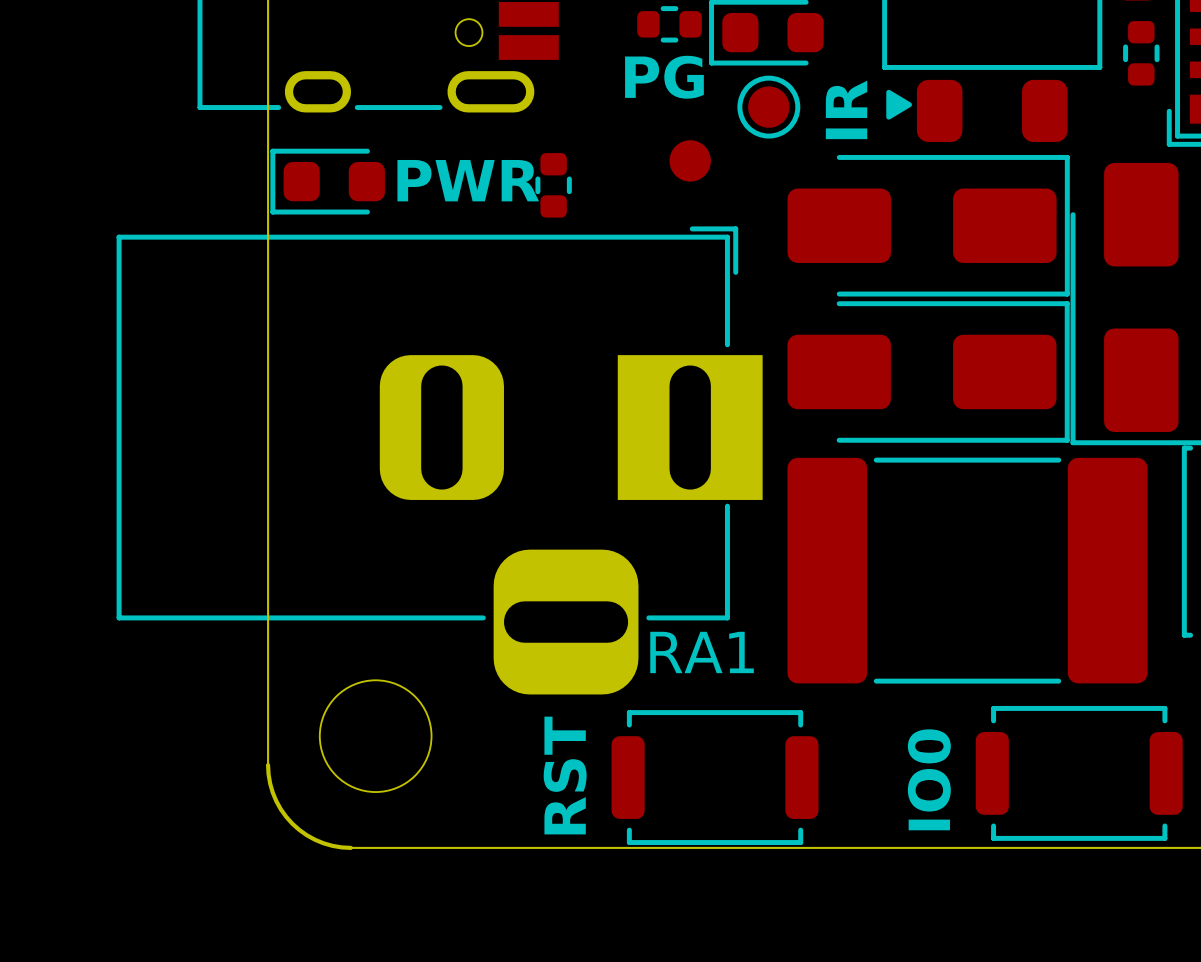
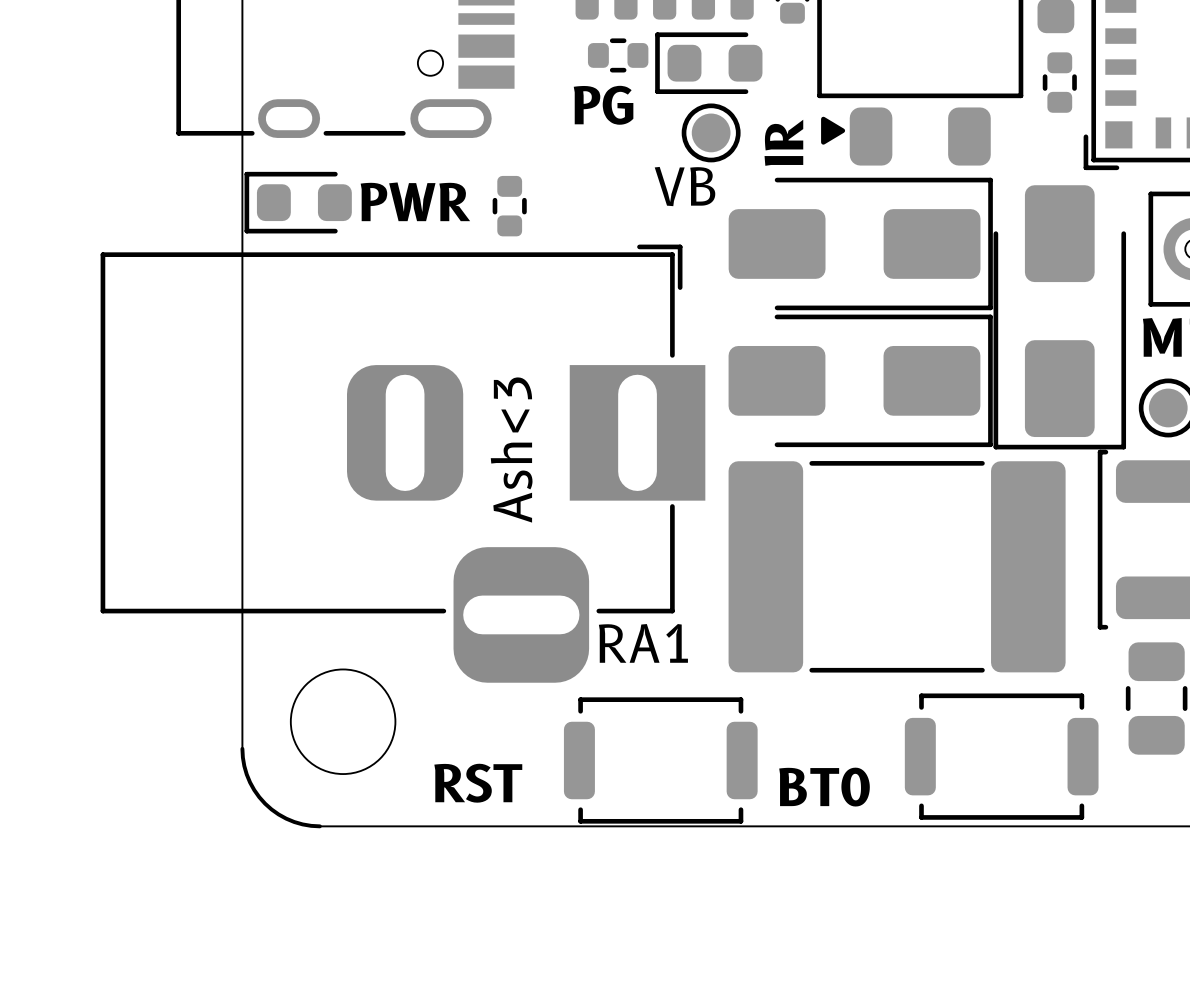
part: (690, 160) -> none
text: none -> VB (685, 186)
text: none -> Ash<3 (511, 450)
text rotation: 0° (565, 775) -> 90° clockwise (478, 783)
text: IO0 (929, 779) -> none
text: none -> BT0 (824, 787)

